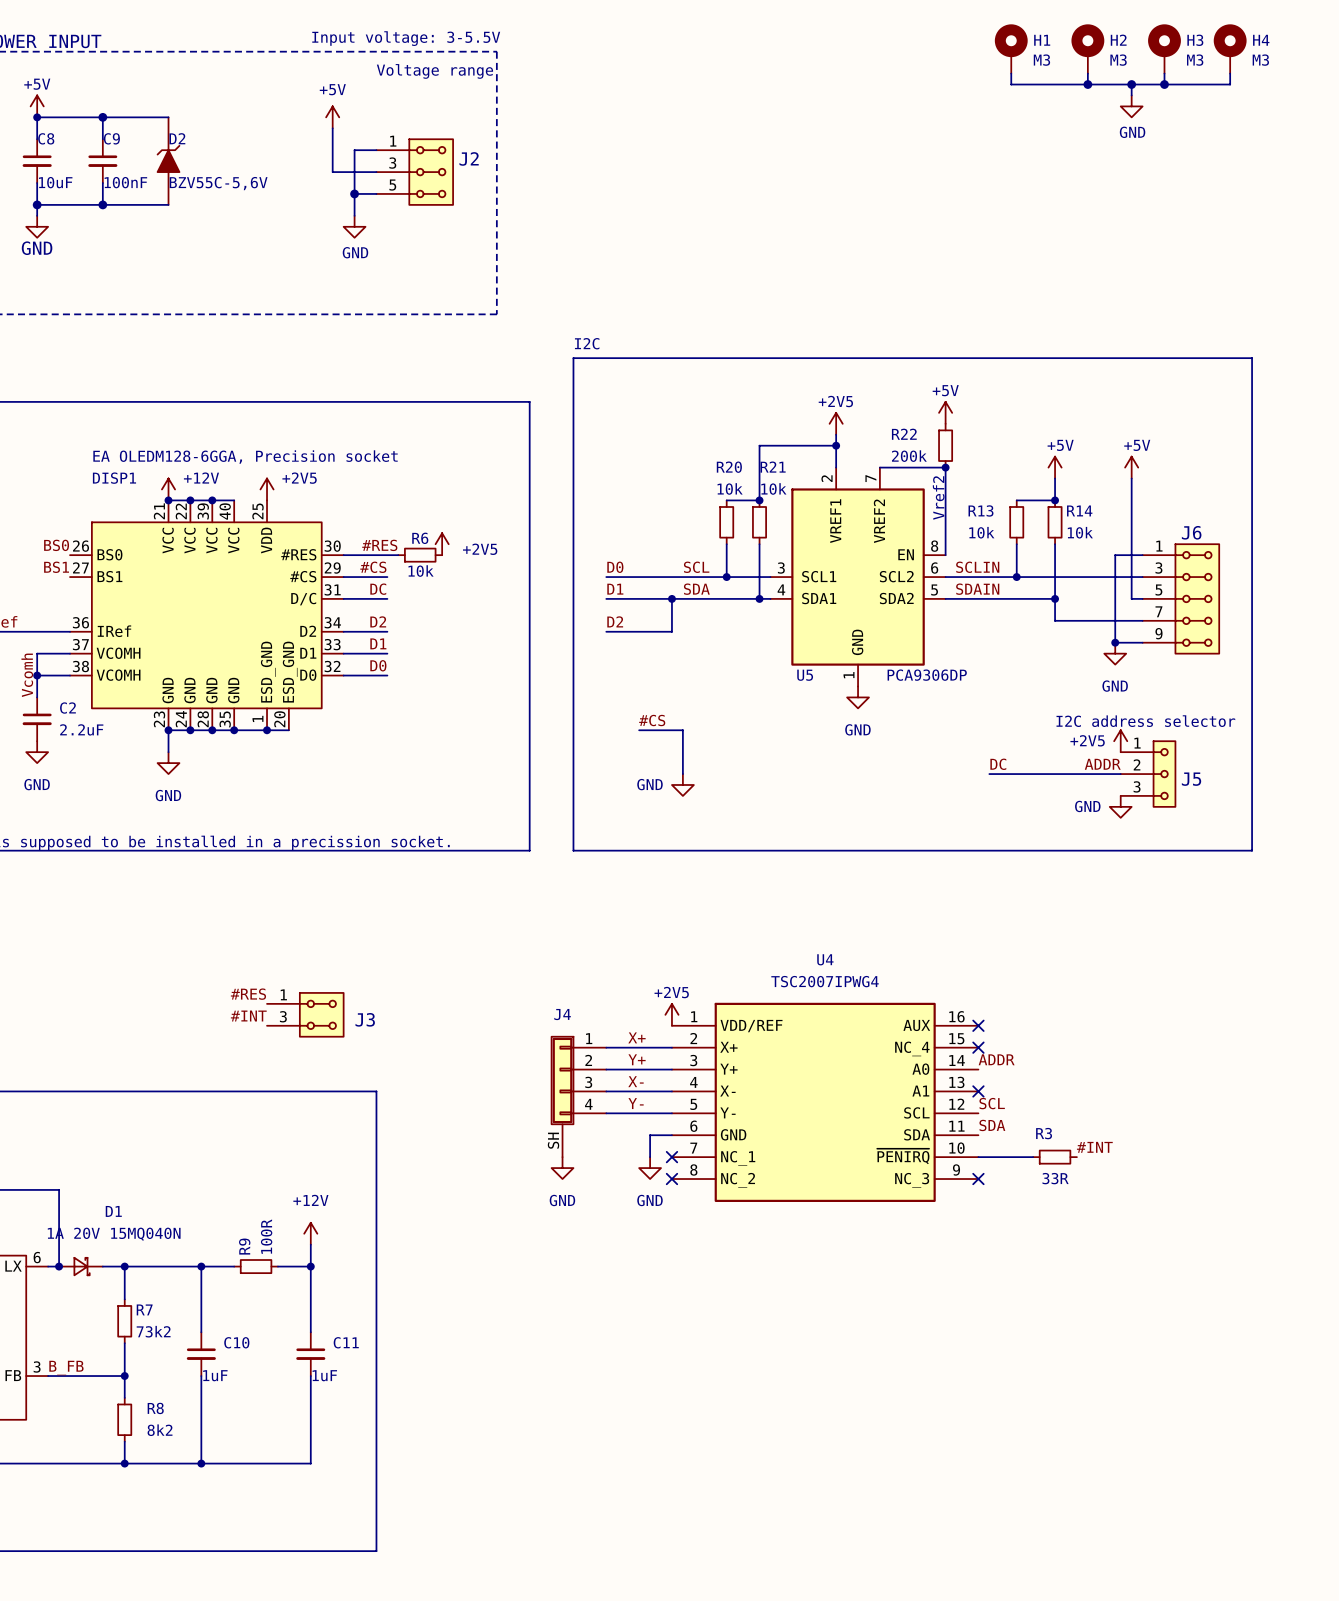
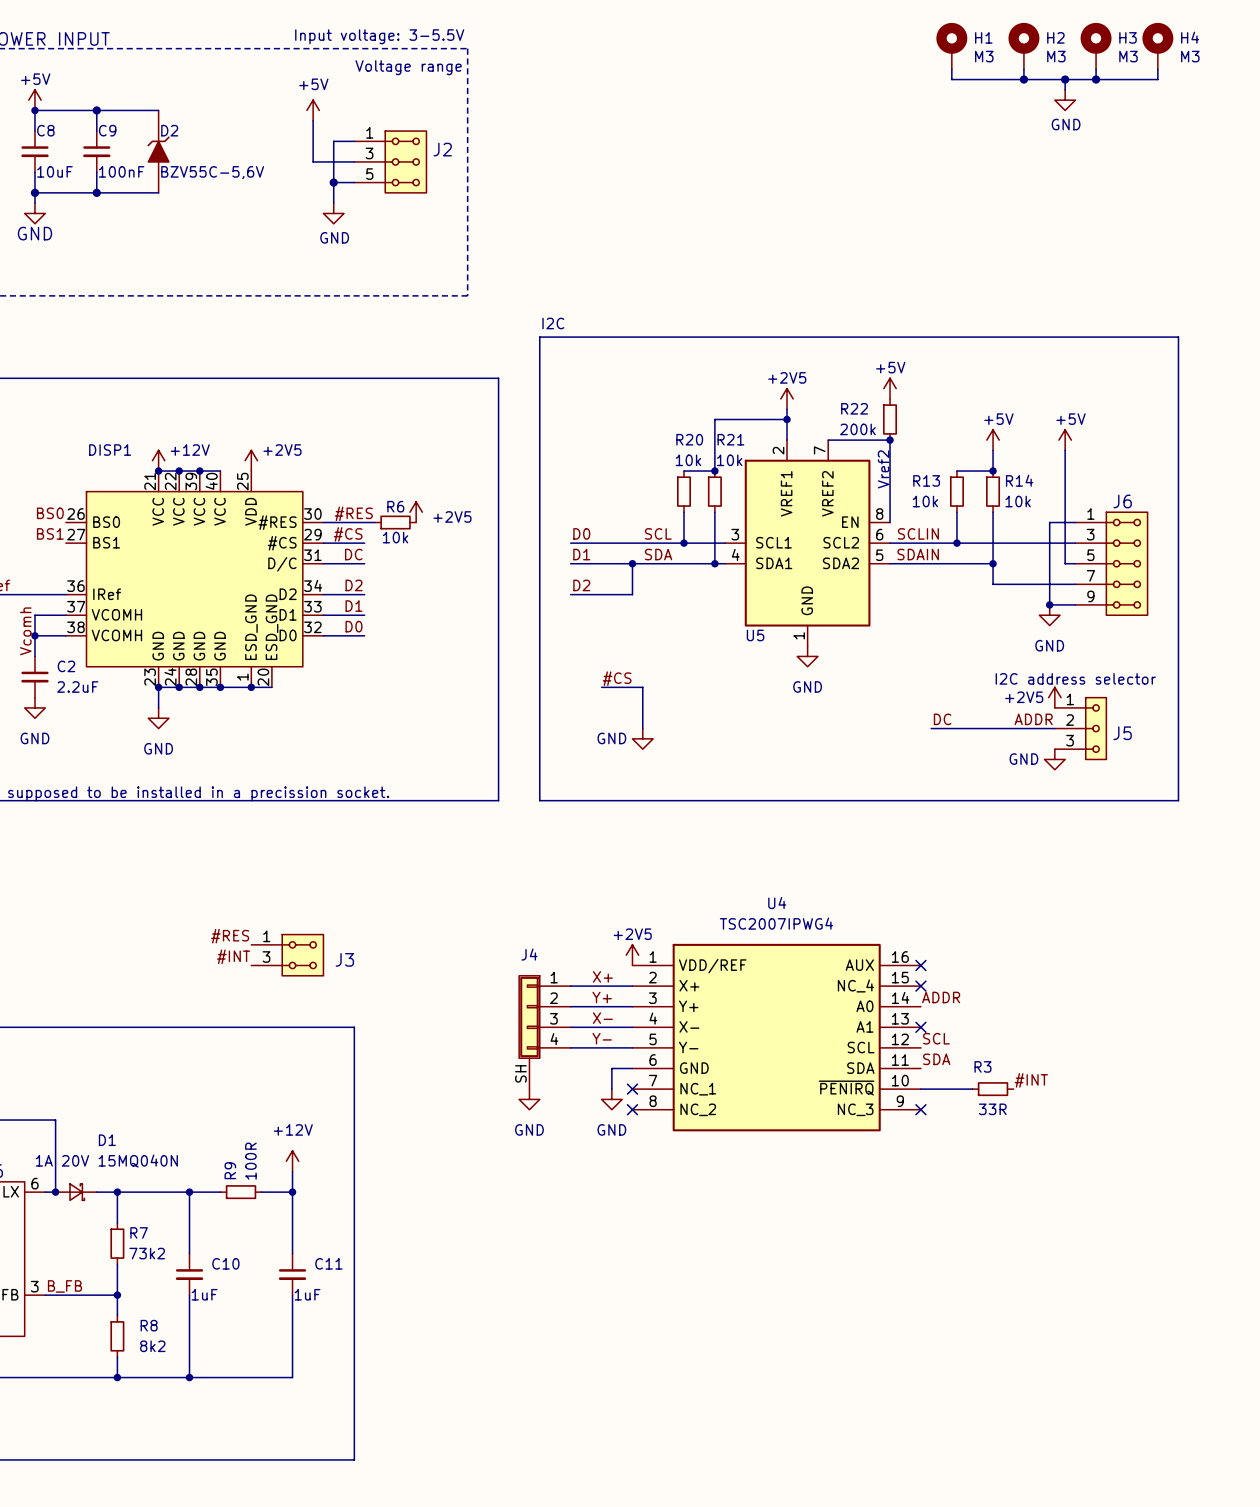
DISP1 value: EA OLEDM128-6GGA, Precision socket (245, 457) -> none
U5 value: PCA9306DP (927, 675) -> none

